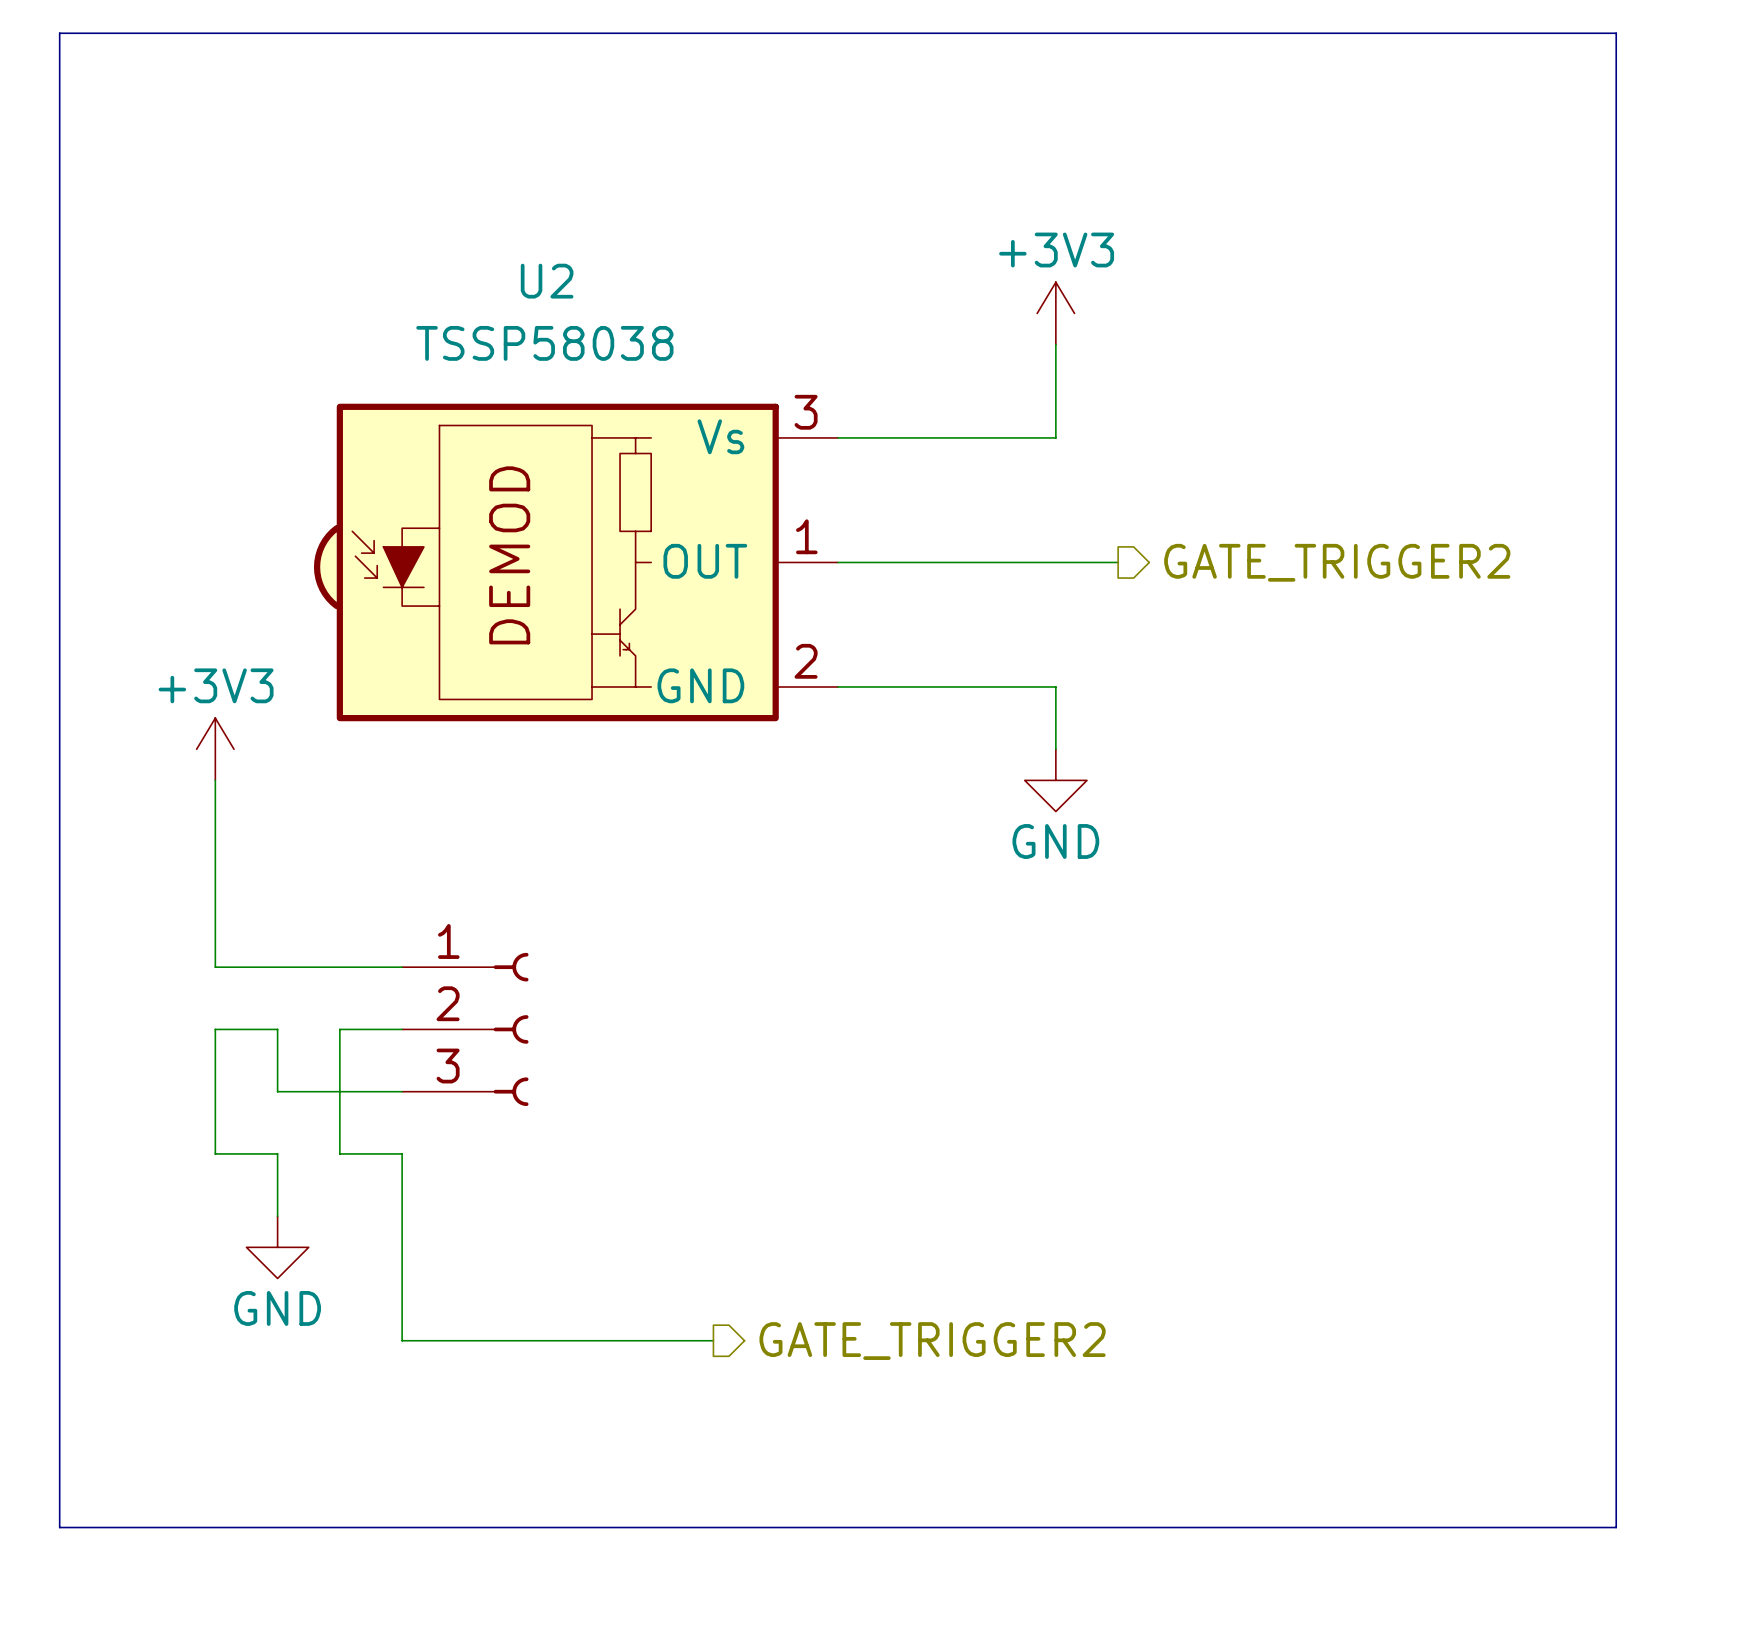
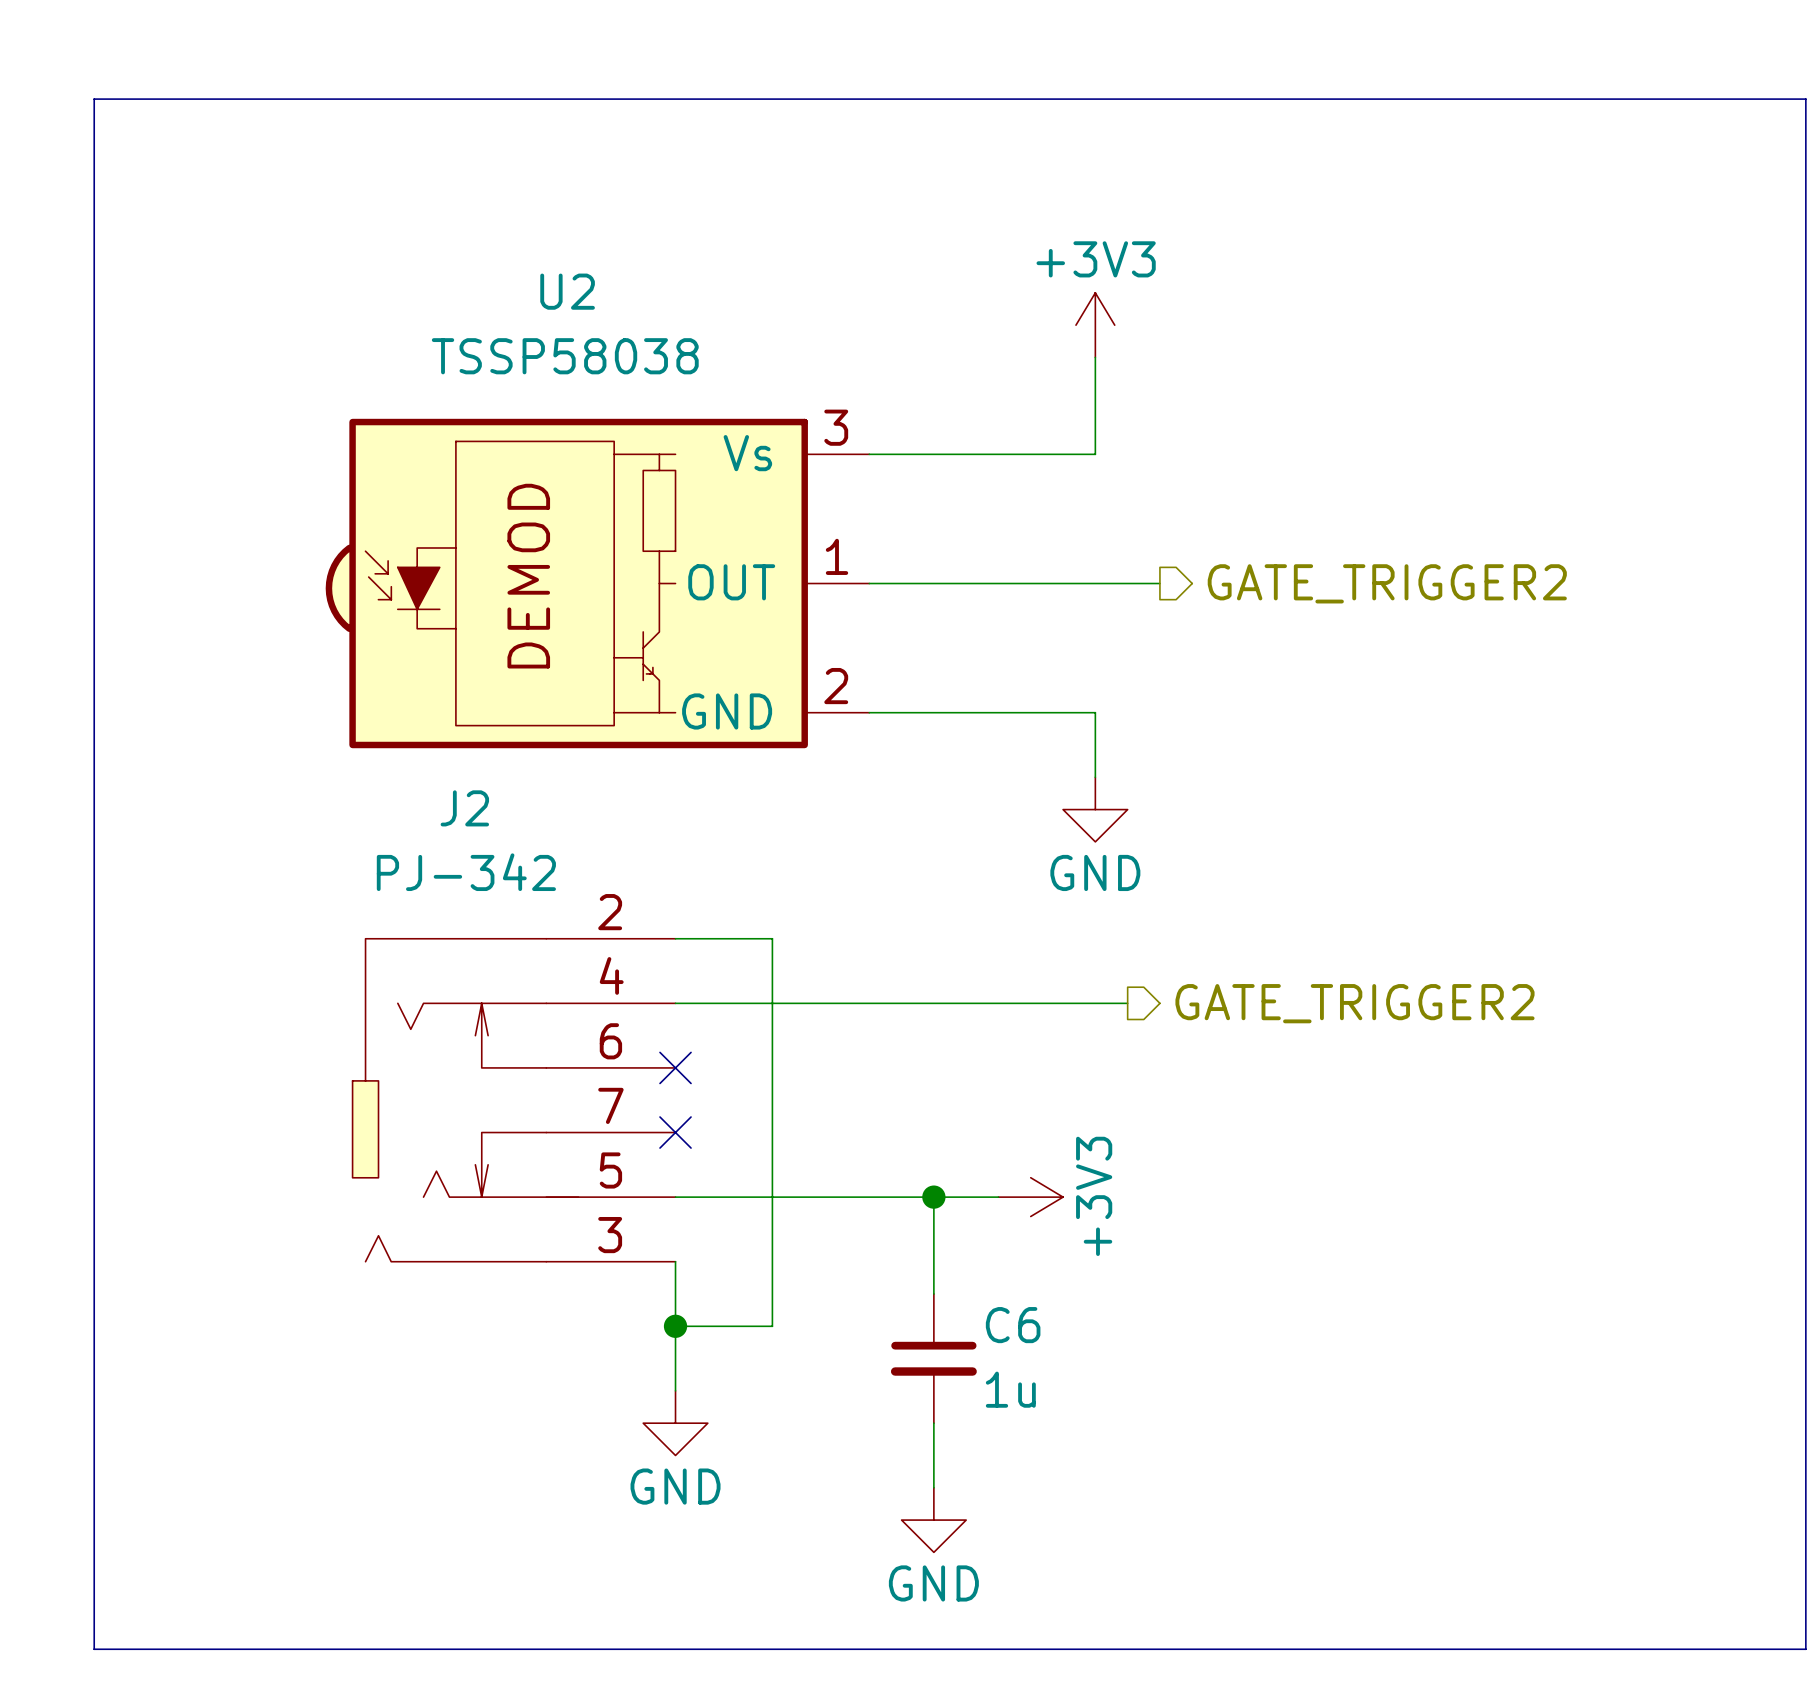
line: (59, 33) (1616, 33) (1616, 1527) (59, 1527) (59, 33) -> (94, 99) (94, 1649) (1805, 1649) (1805, 99) (94, 99)
power symbol: +3V3 (215, 749) -> none
wire: (215, 780) (215, 967) (402, 967) -> none
wire: none -> (675, 938) (772, 938) (772, 1326) (675, 1326)
wire: none -> (675, 1003) (1127, 1003)
wire: (402, 1029) (339, 1029) (339, 1153) (402, 1153) (402, 1340) (713, 1340) -> none
part: (465, 1029) -> none
no-connect mark: none -> (675, 1067)
J2: none -> (514, 1100)
wire: (402, 1091) (277, 1091) (277, 1029) (215, 1029) (215, 1153) (277, 1153) (277, 1216) -> none
no-connect mark: none -> (675, 1132)
wire: none -> (675, 1197) (998, 1197)
wire: none -> (933, 1197) (933, 1294)
junction: none -> (933, 1197)
power symbol: none -> +3V3 (1030, 1197)
wire: none -> (675, 1261) (675, 1390)
power symbol: GND (277, 1247) -> none
junction: none -> (675, 1326)
C6: none -> (933, 1358)
hierarchical label position: GATE_TRIGGER2 (932, 1341) -> GATE_TRIGGER2 (1354, 1003)
power symbol: none -> GND (675, 1423)
wire: none -> (933, 1423) (933, 1487)
power symbol: none -> GND (933, 1520)

